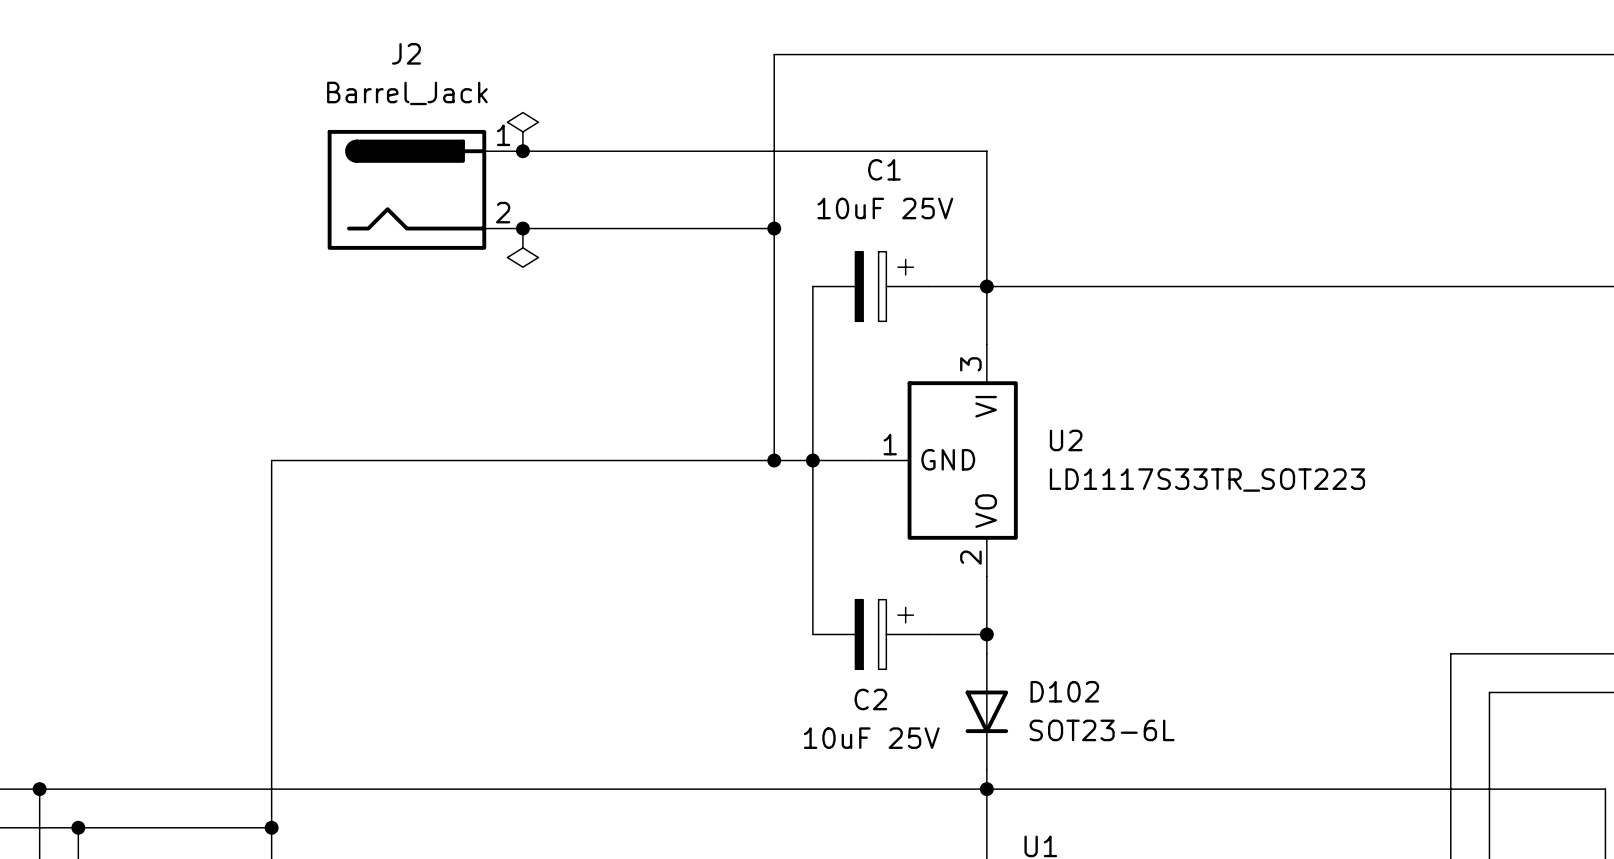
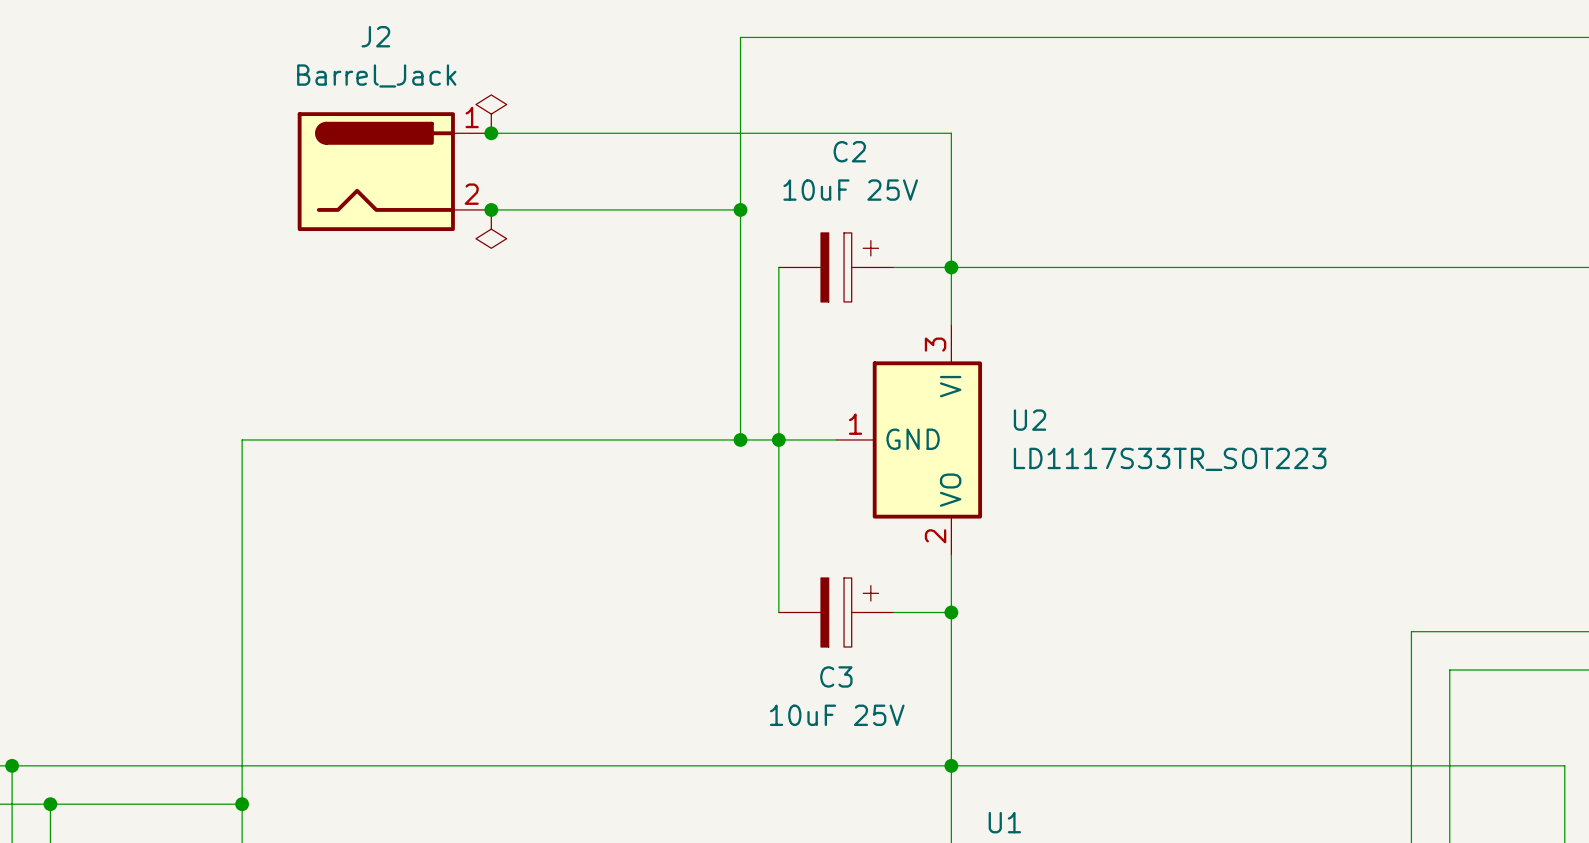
C1 name: C1 (884, 169) -> C2 (849, 151)
C2 name: C2 (870, 699) -> C3 (836, 676)
D102: SOT23-6L (986, 711) -> none

